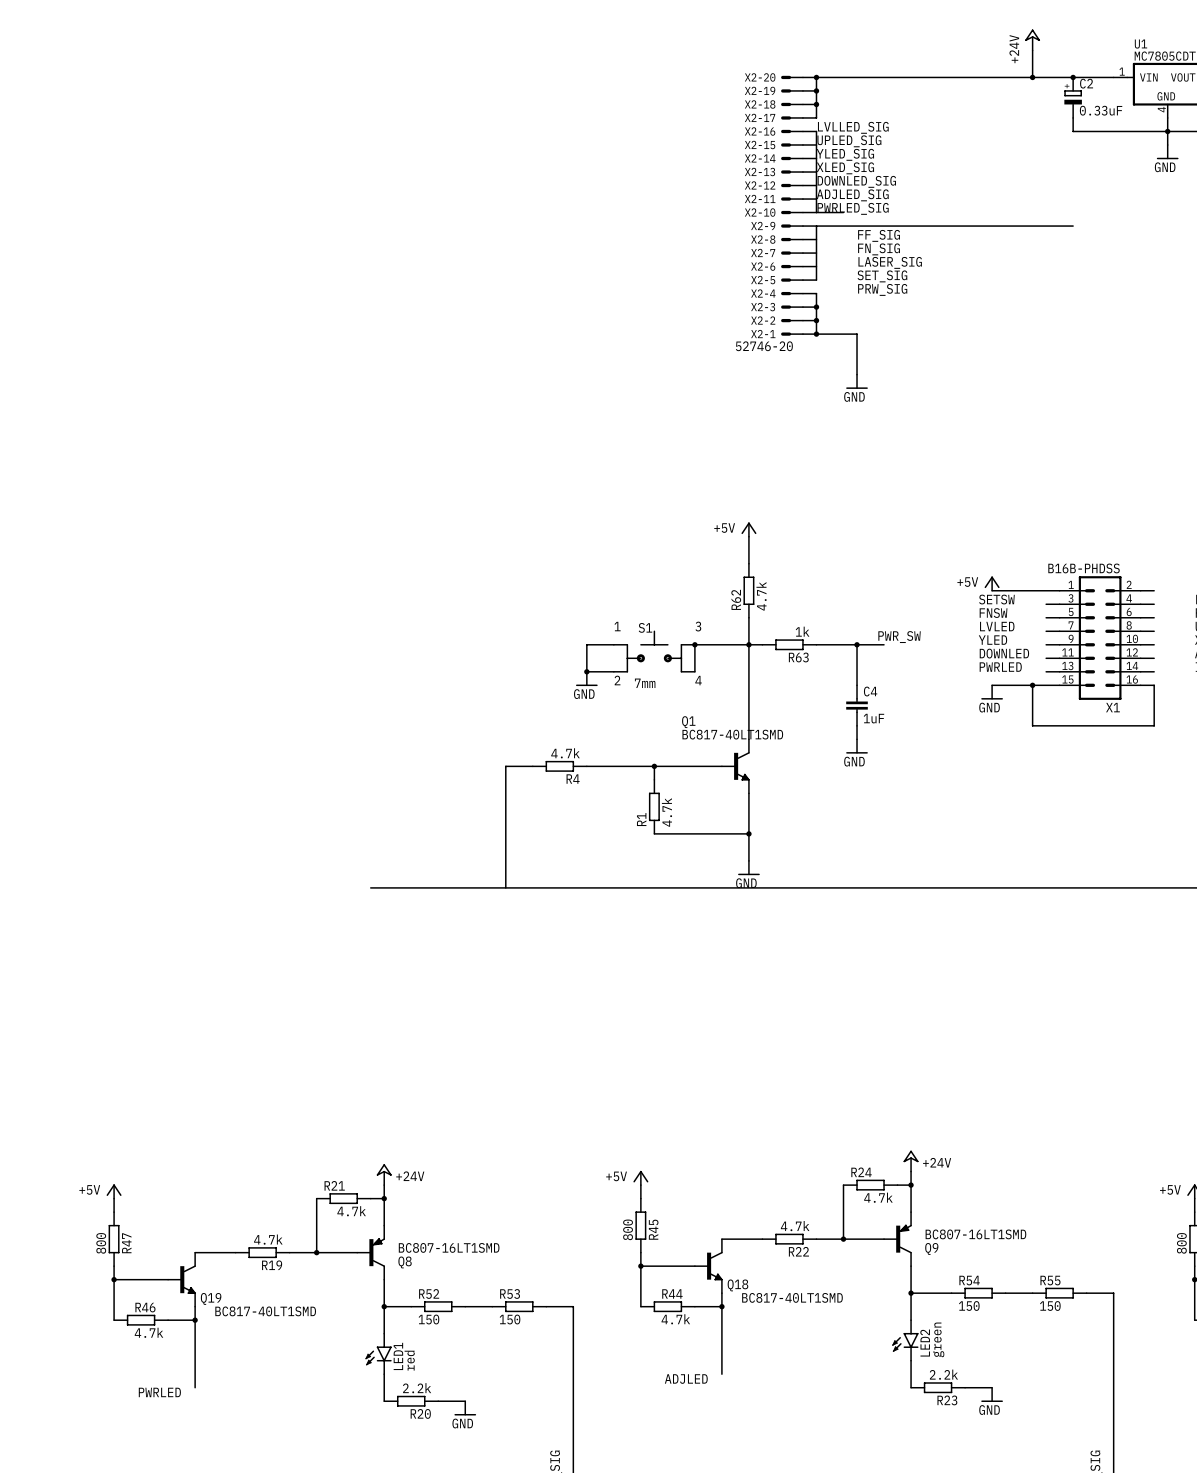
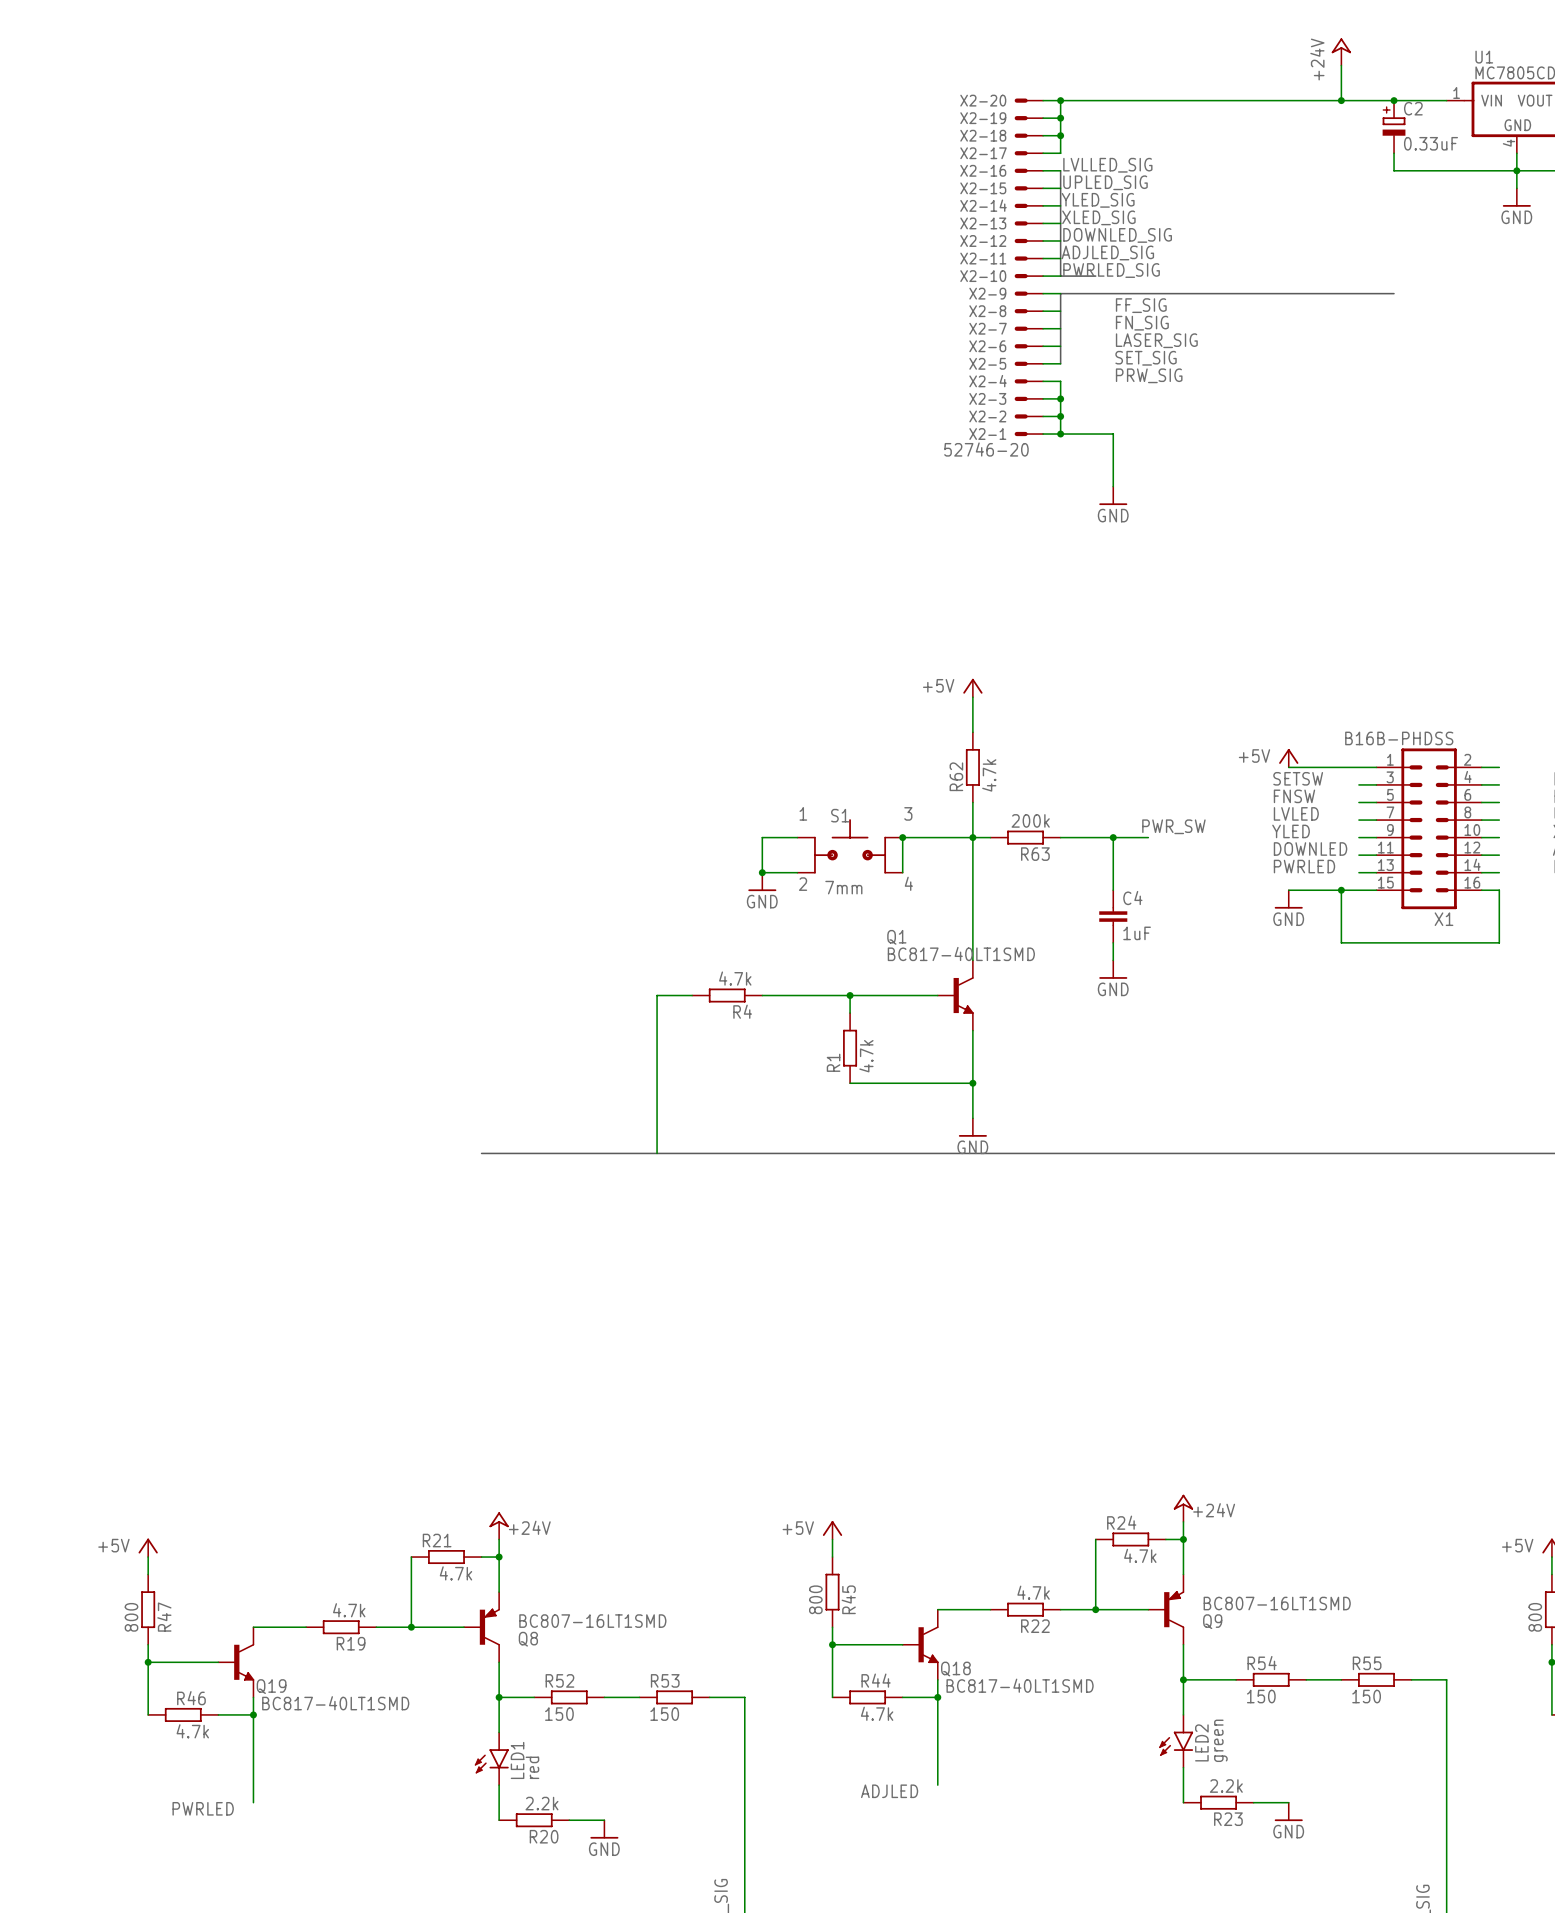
R63 value: 1k (802, 631) -> 200k (1030, 820)

